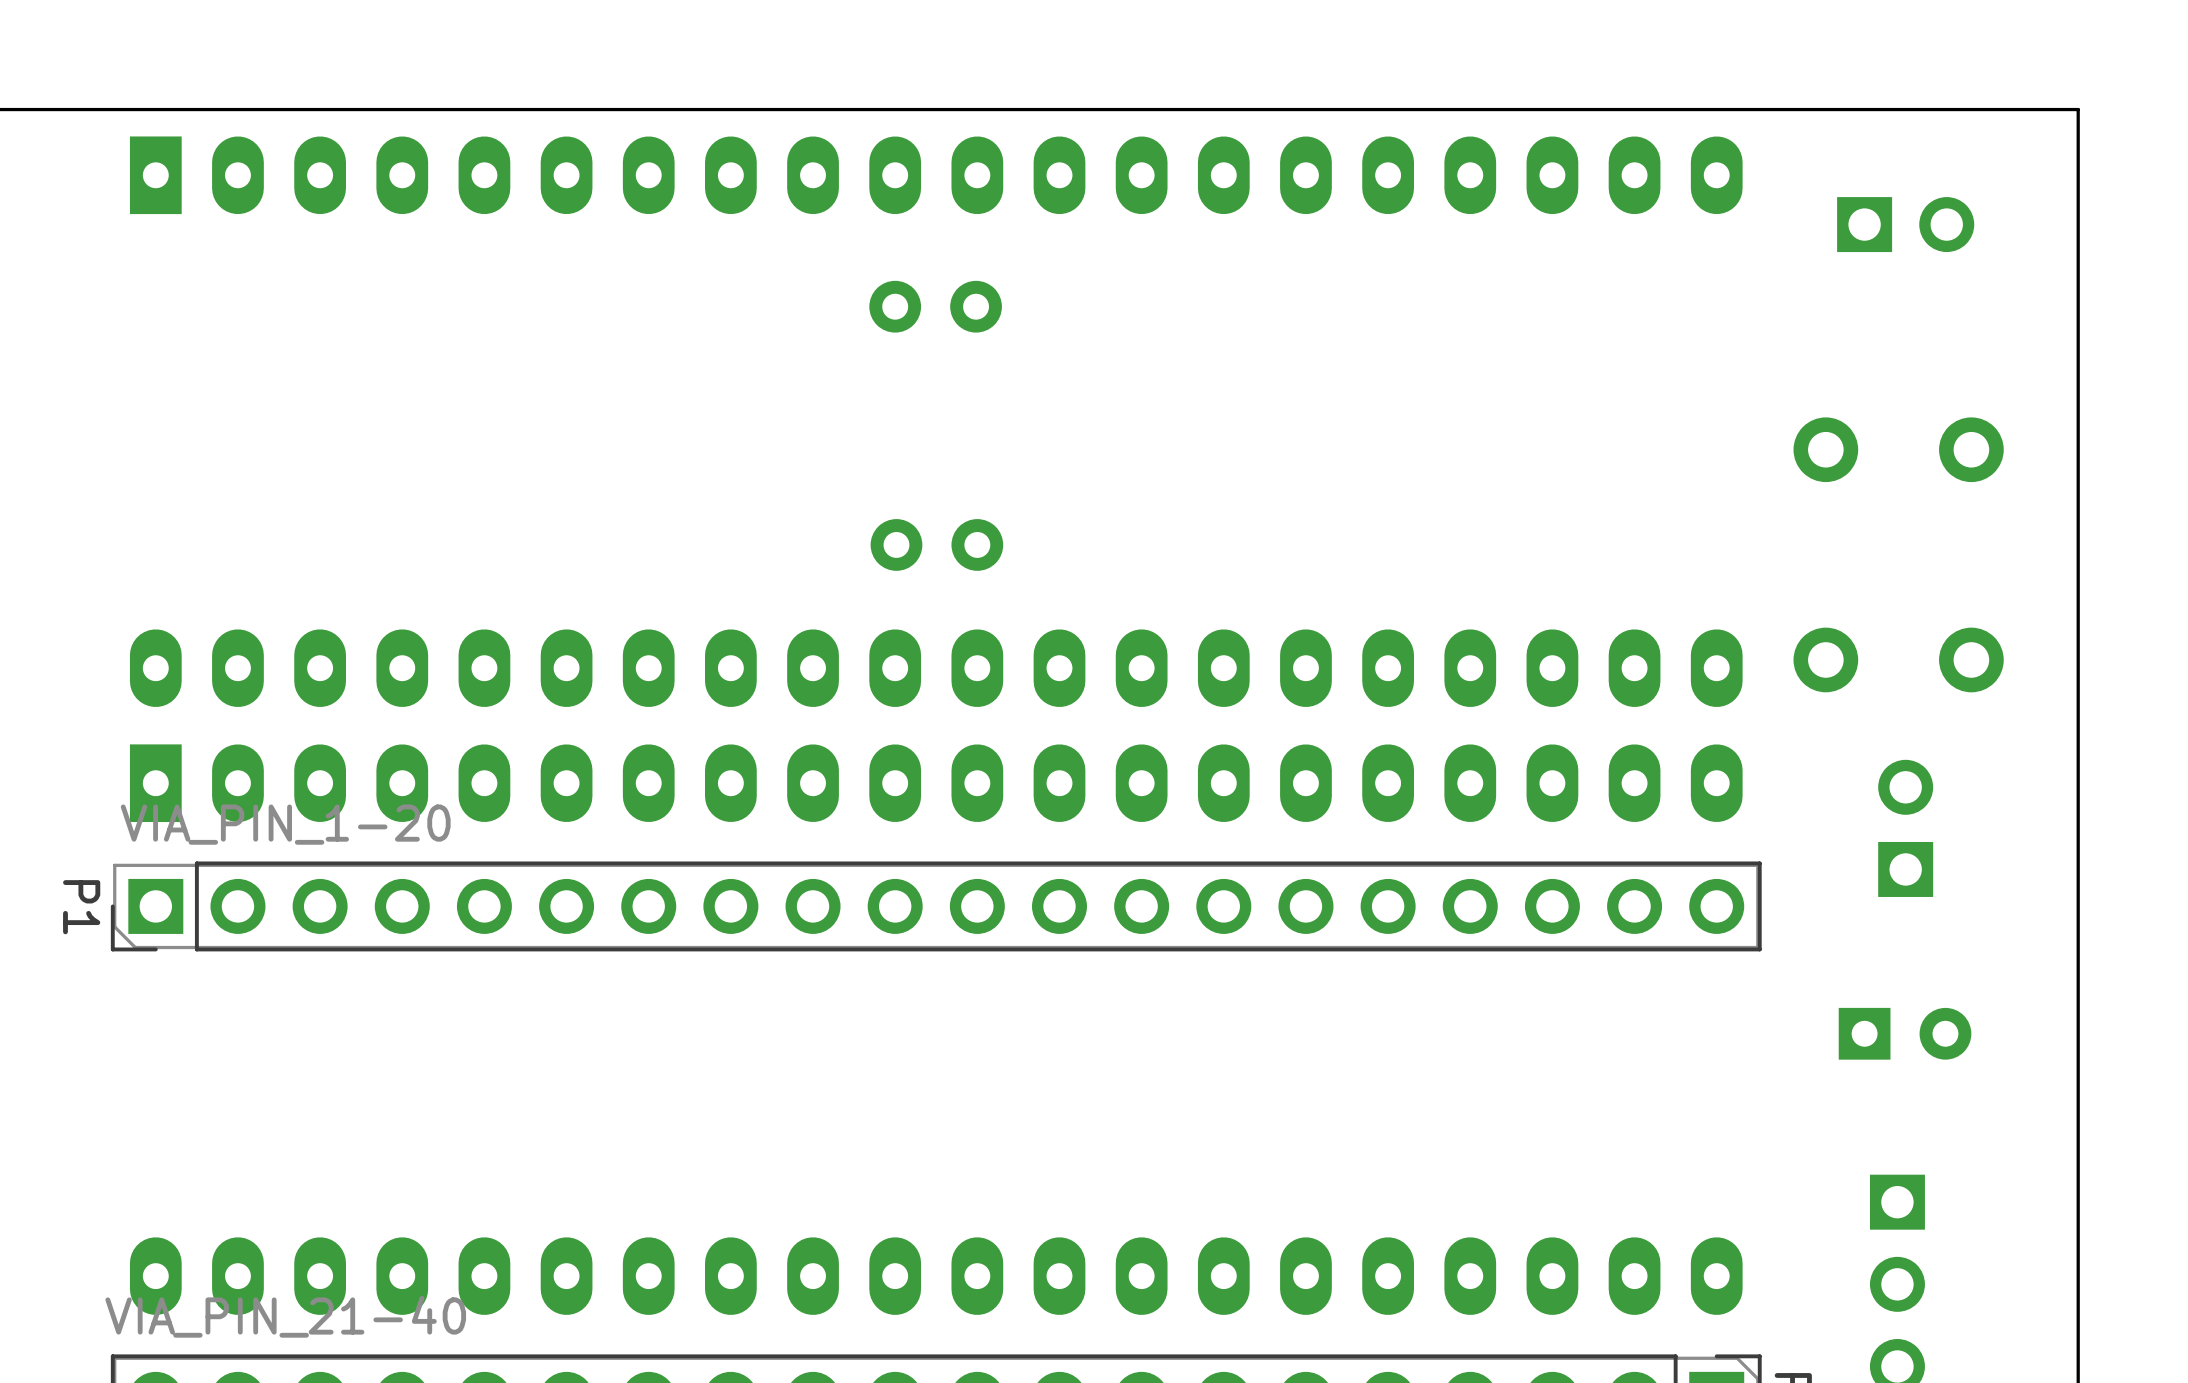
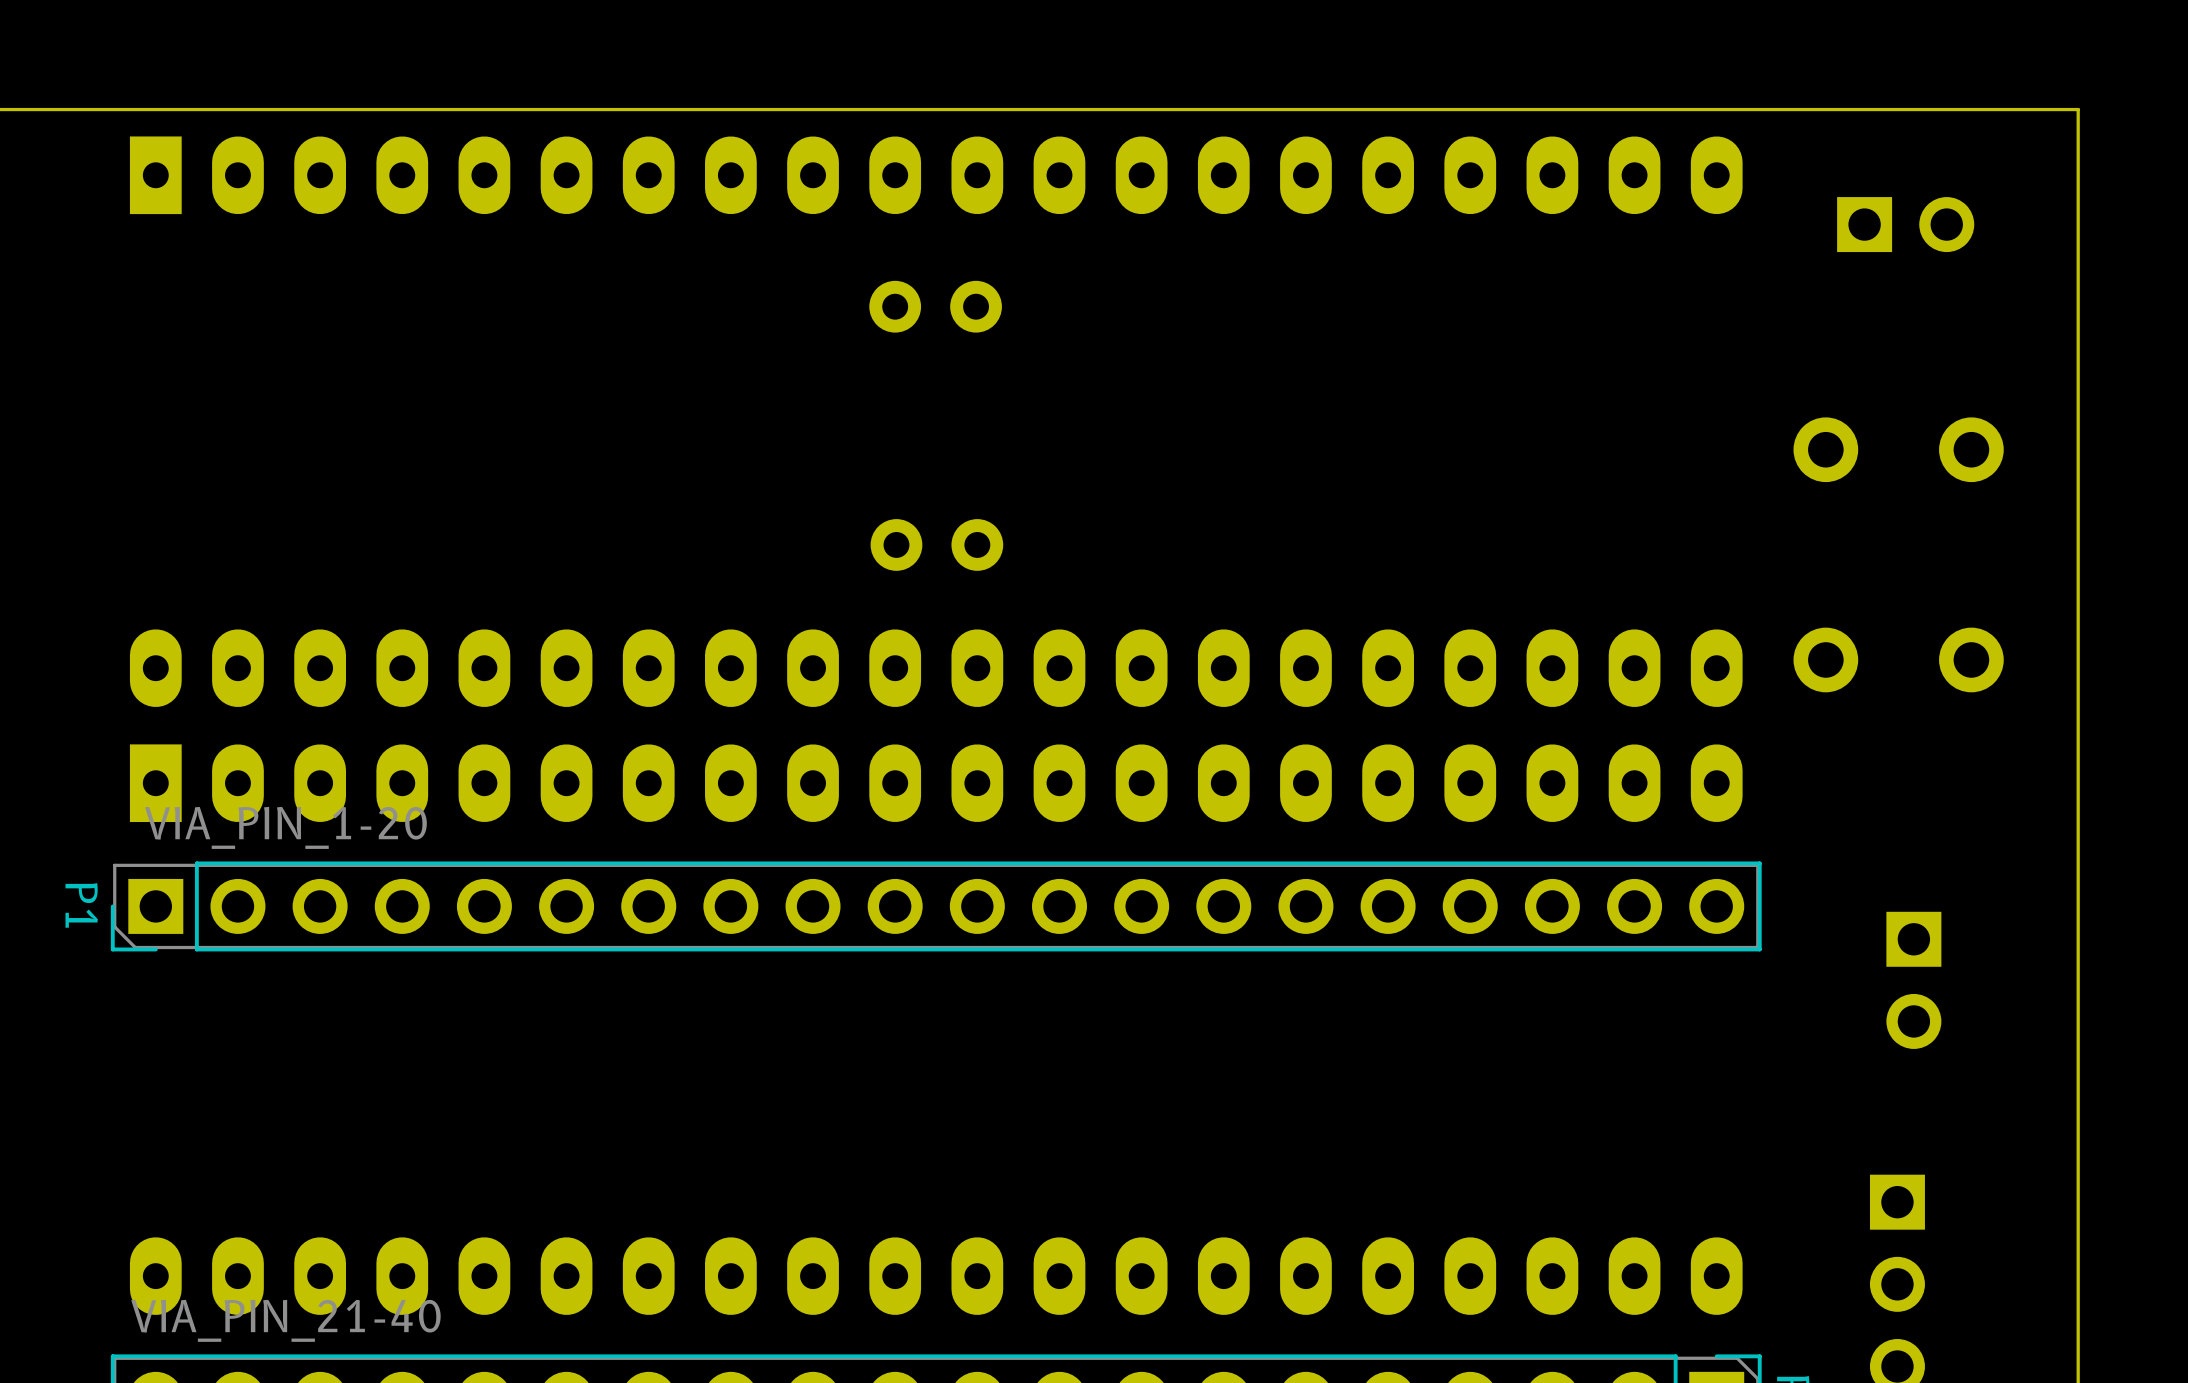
part rotation: 0° (1905, 828) -> 180° (1913, 980)
part position: (1905, 828) -> (1913, 980)
part: (1905, 1033) -> none

